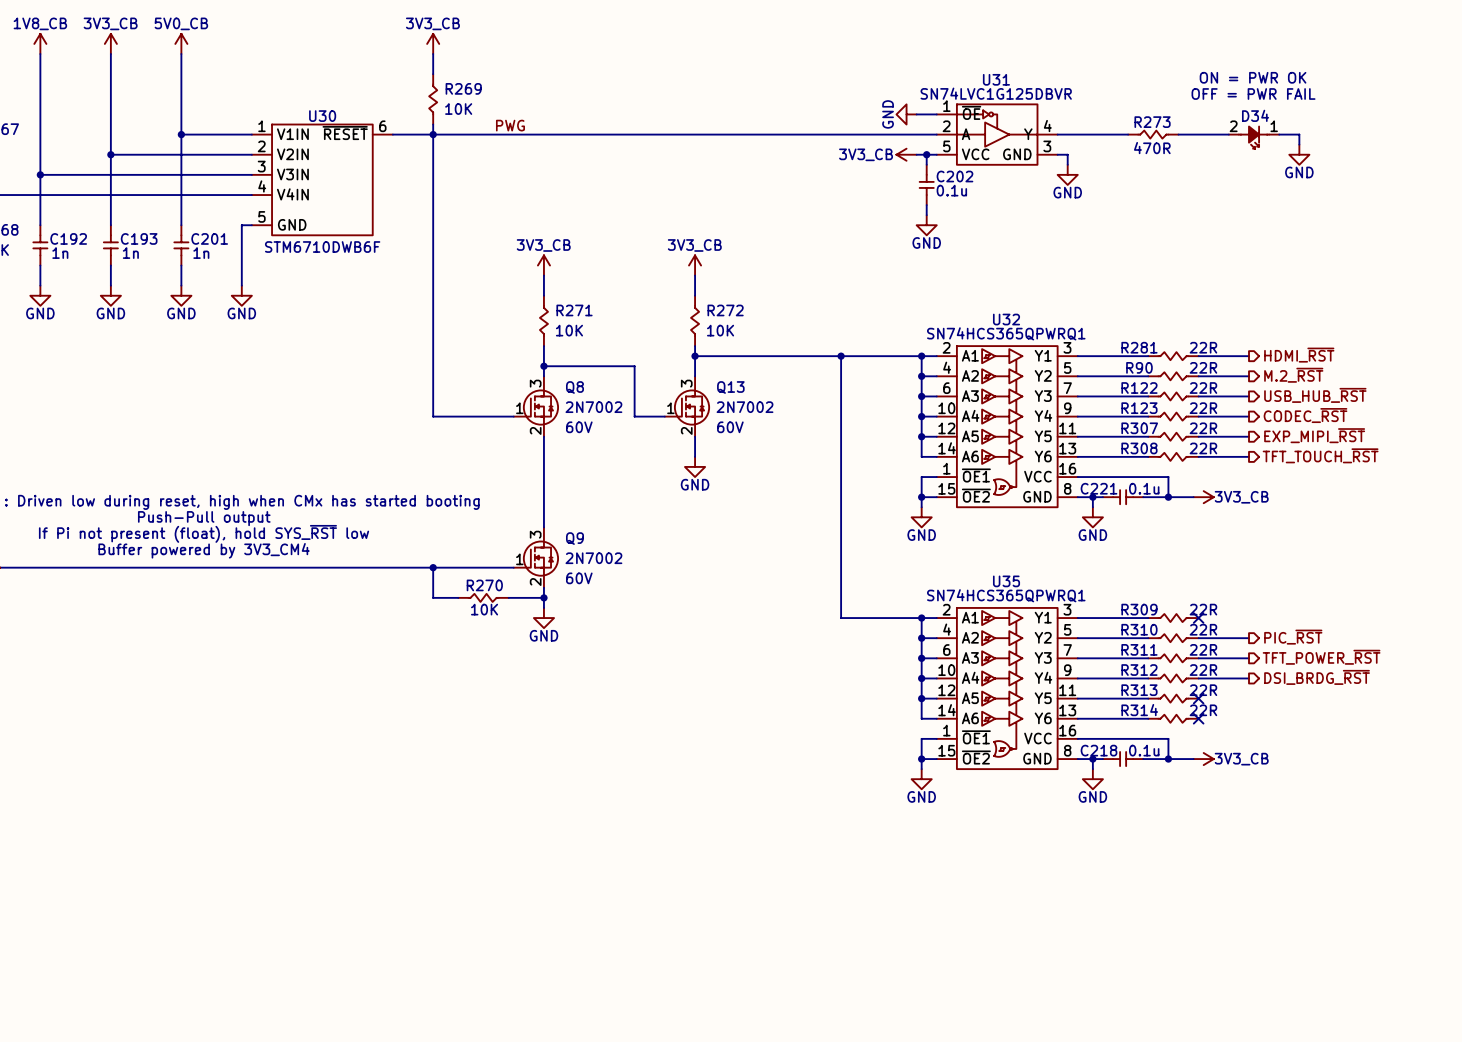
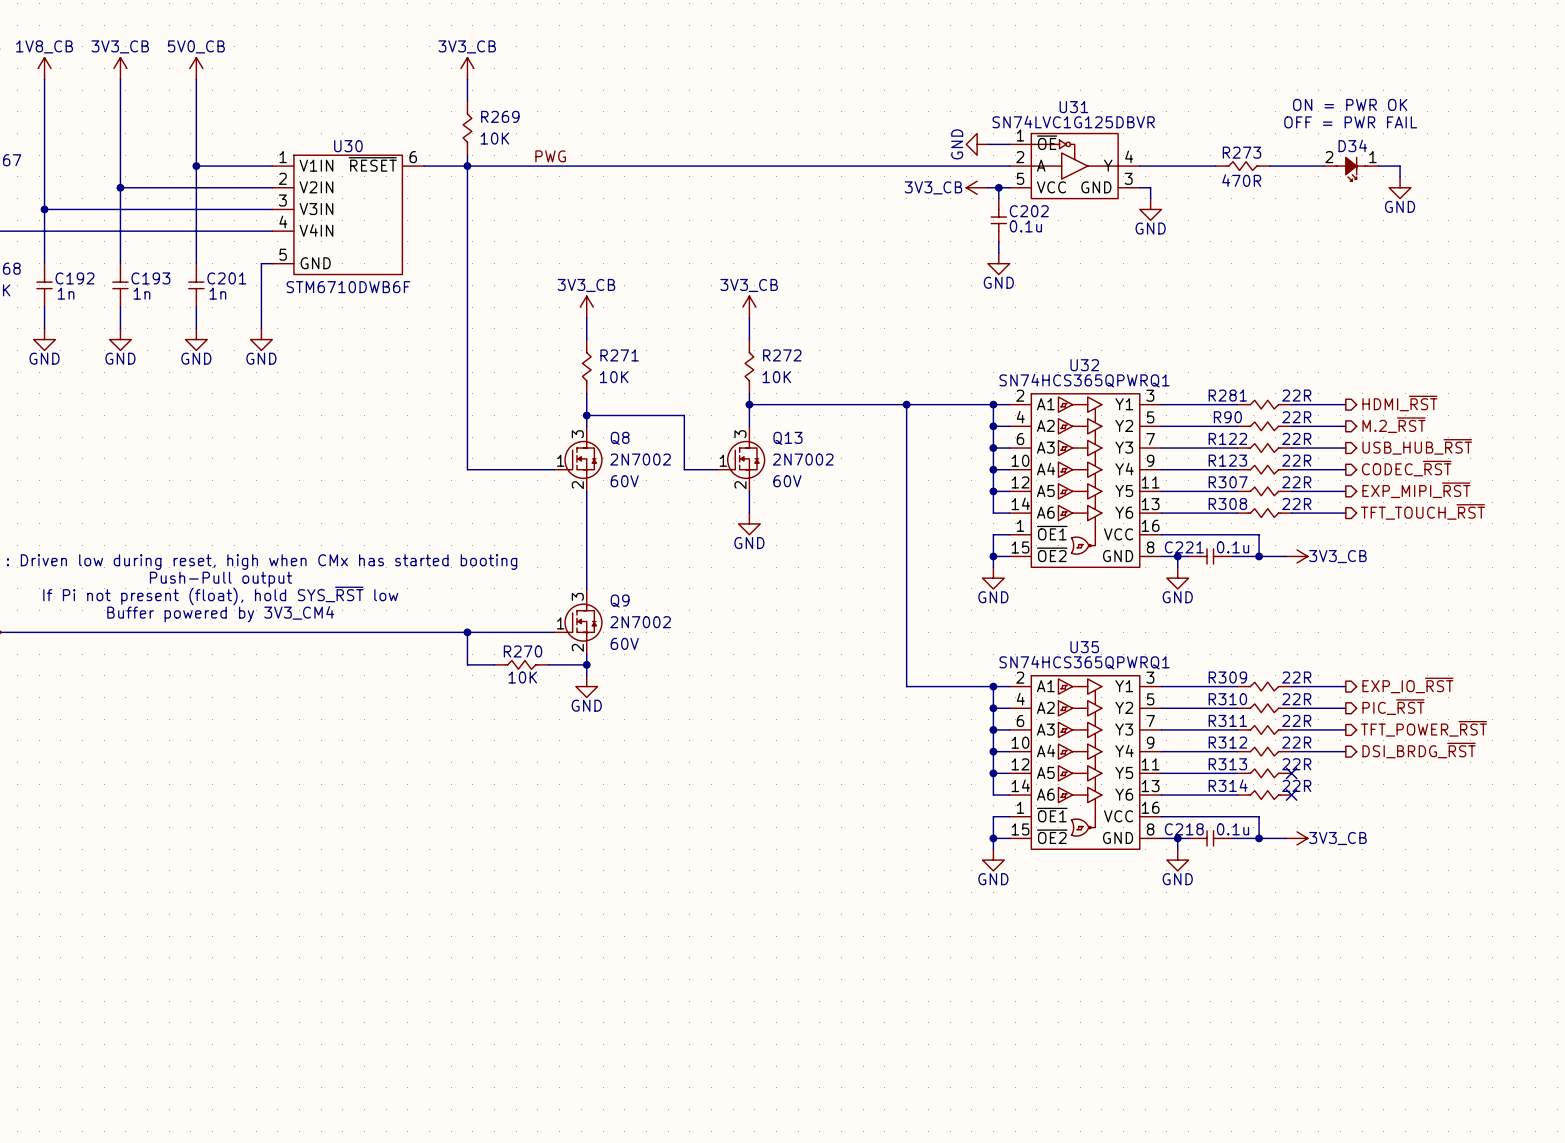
hierarchical label: none -> EXP_IO_~{RST} (1407, 685)
wire: none -> (1291, 686) (1345, 686)
no-connect mark: (1198, 618) -> none

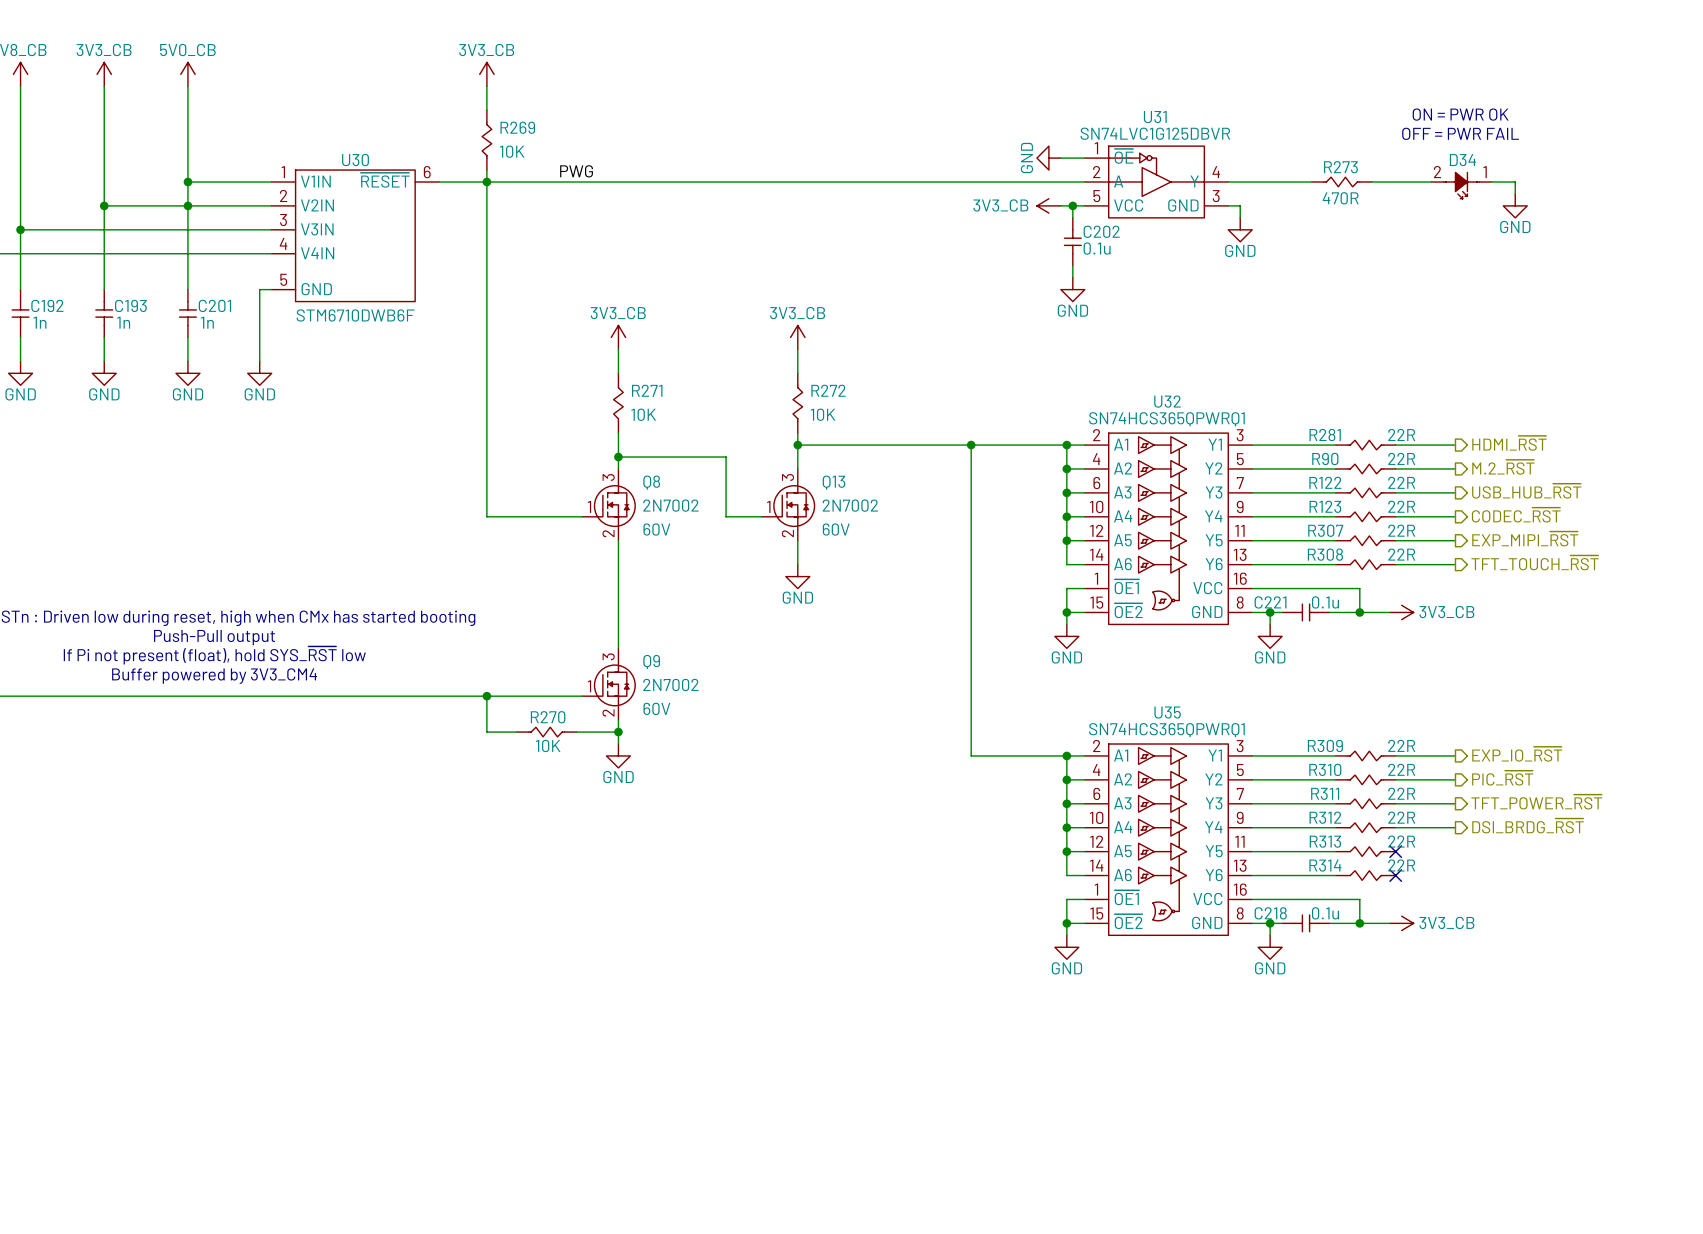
junction: none -> (187, 205)

